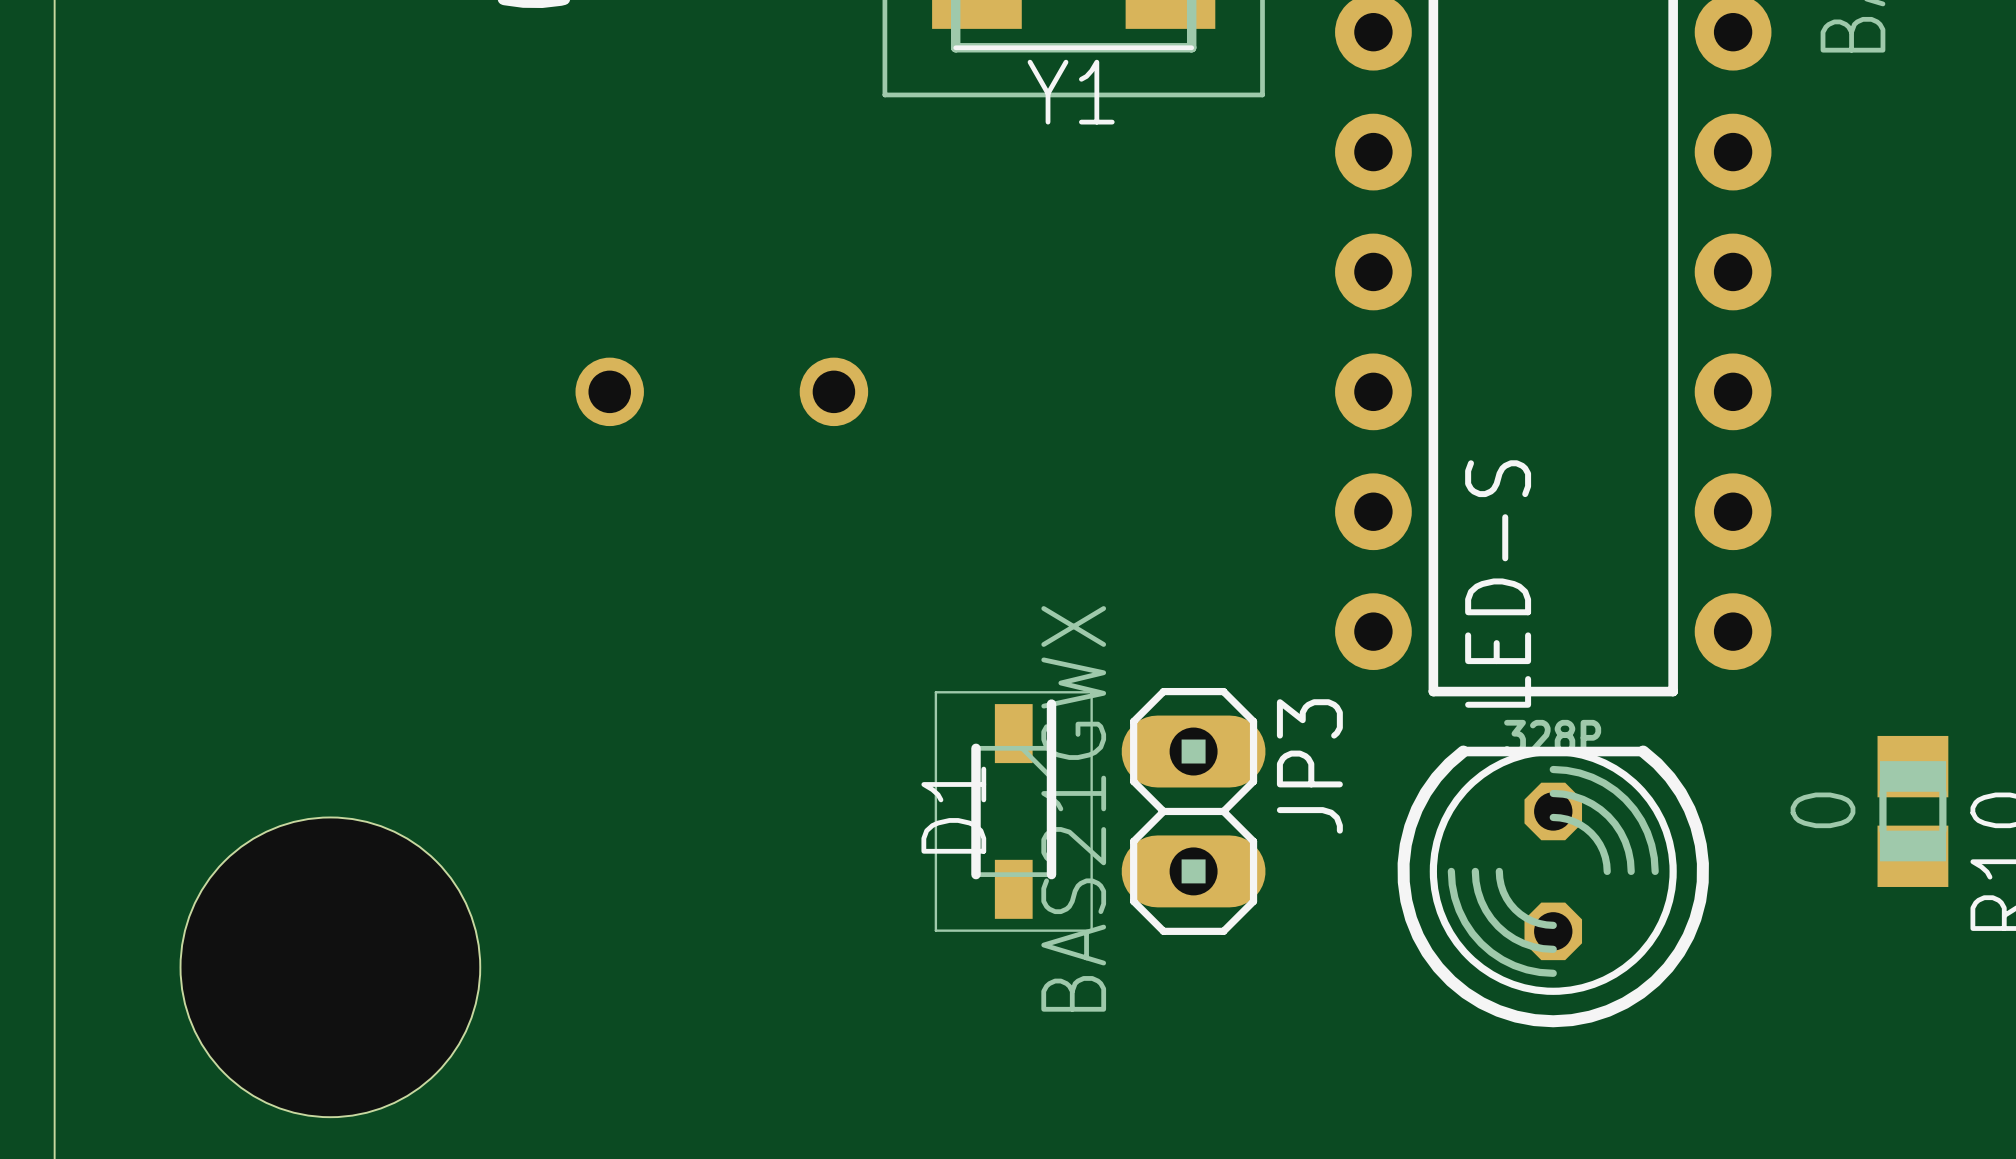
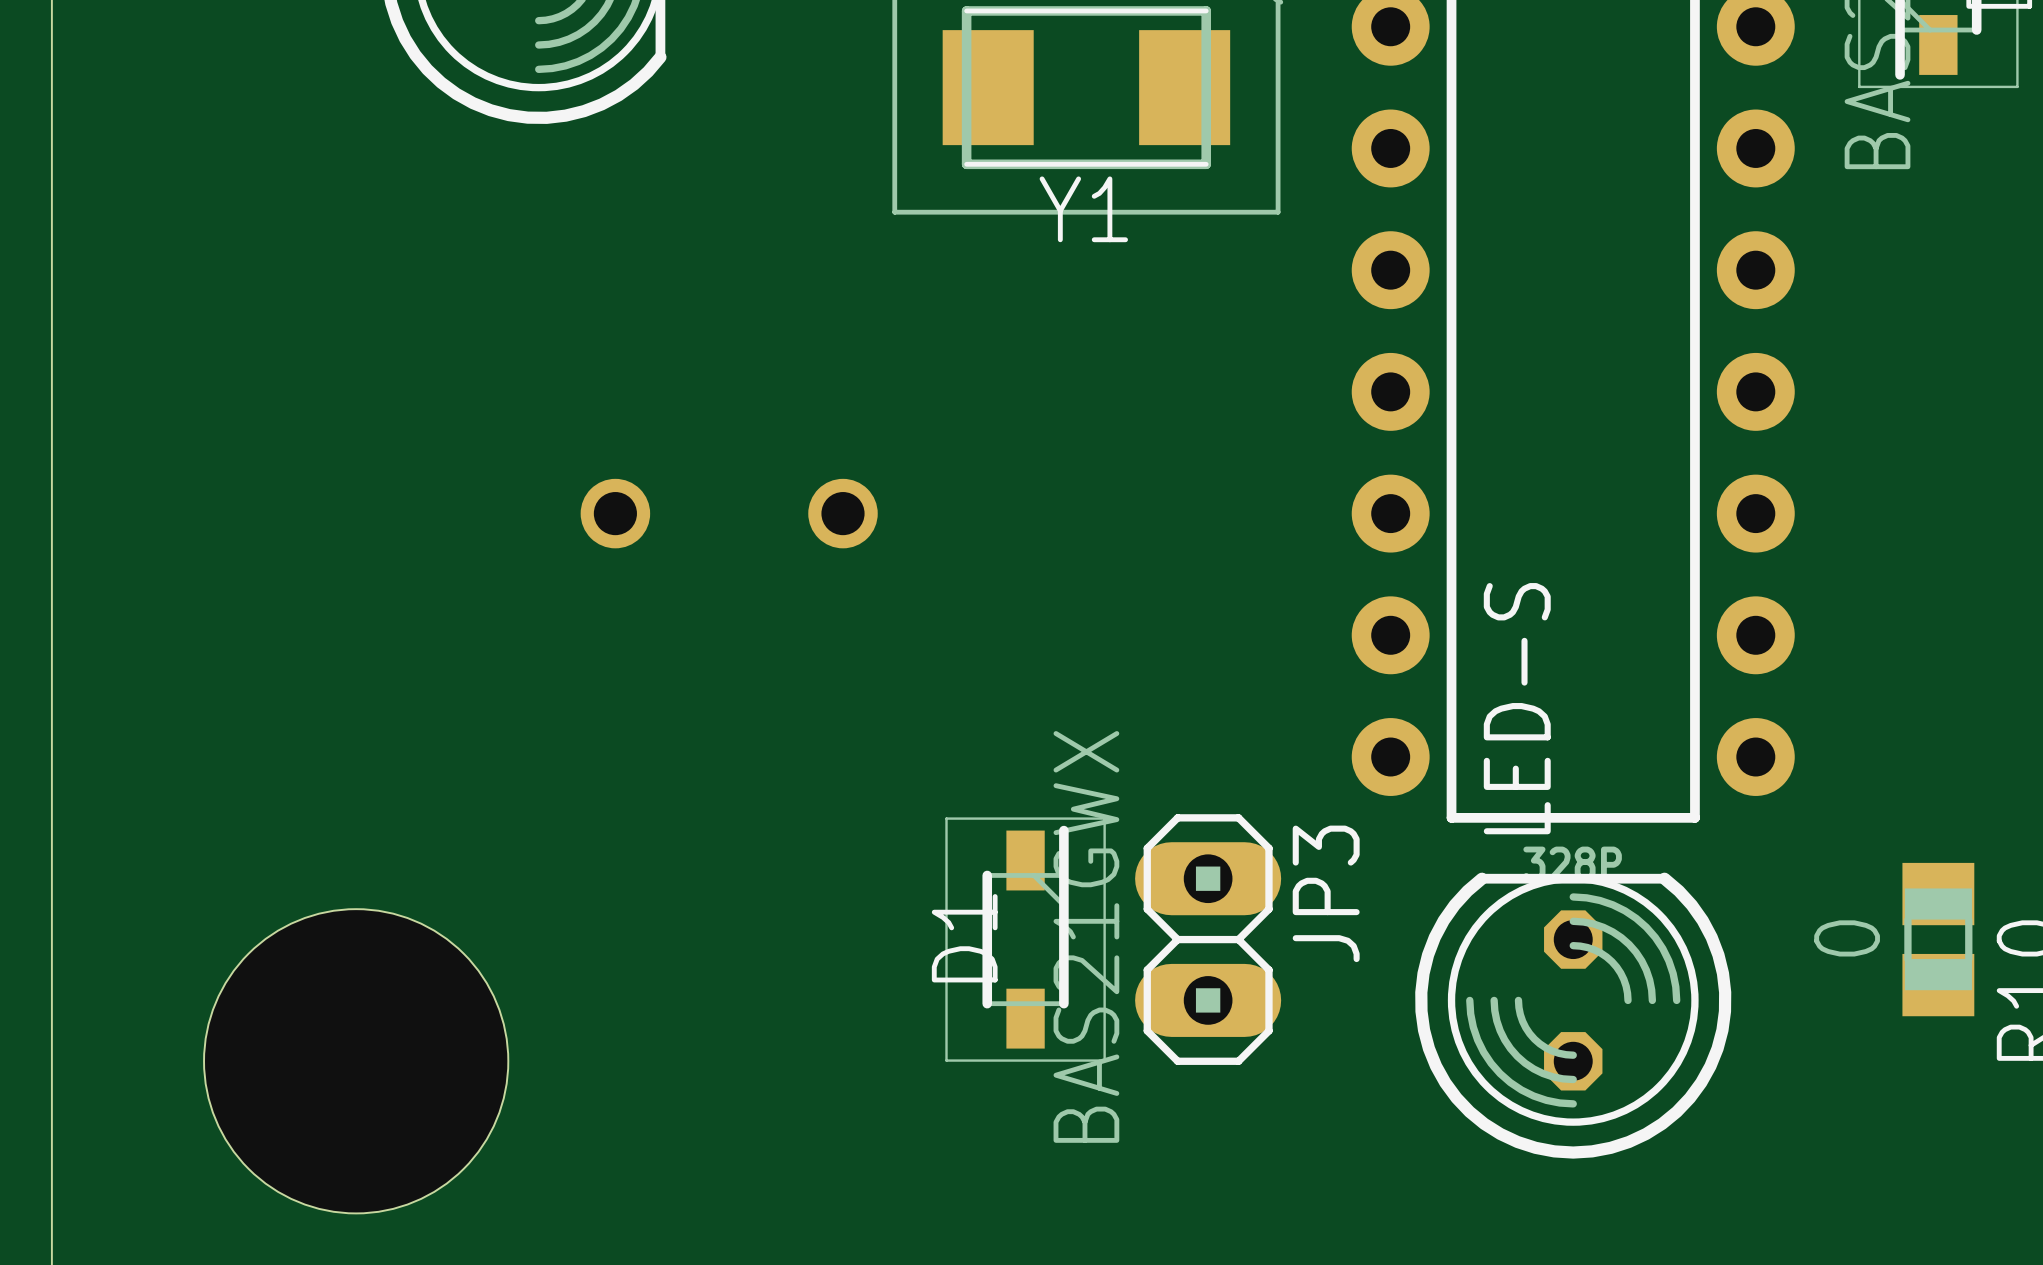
hole position: (330, 967) -> (356, 1061)

